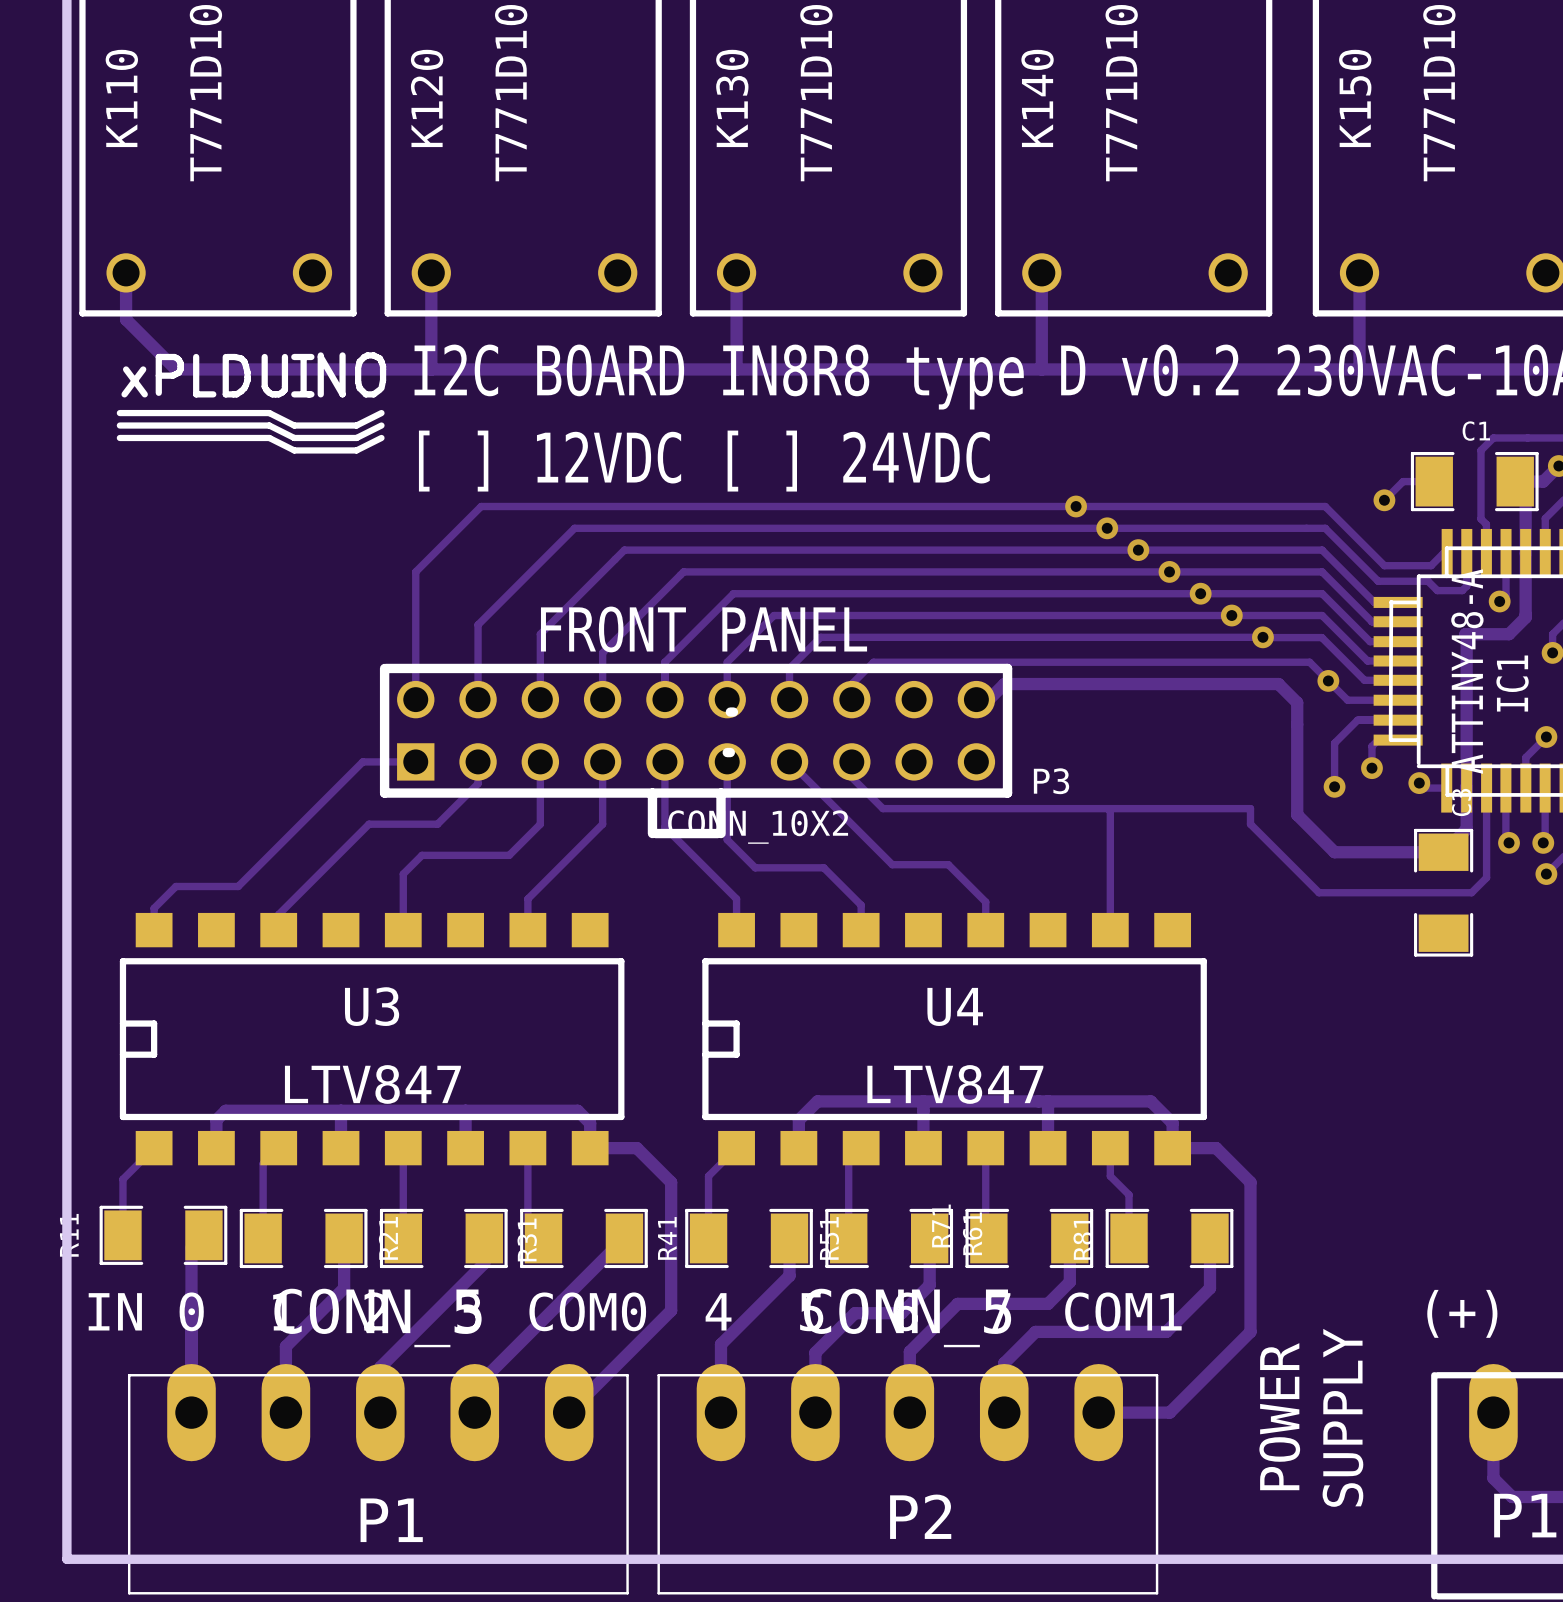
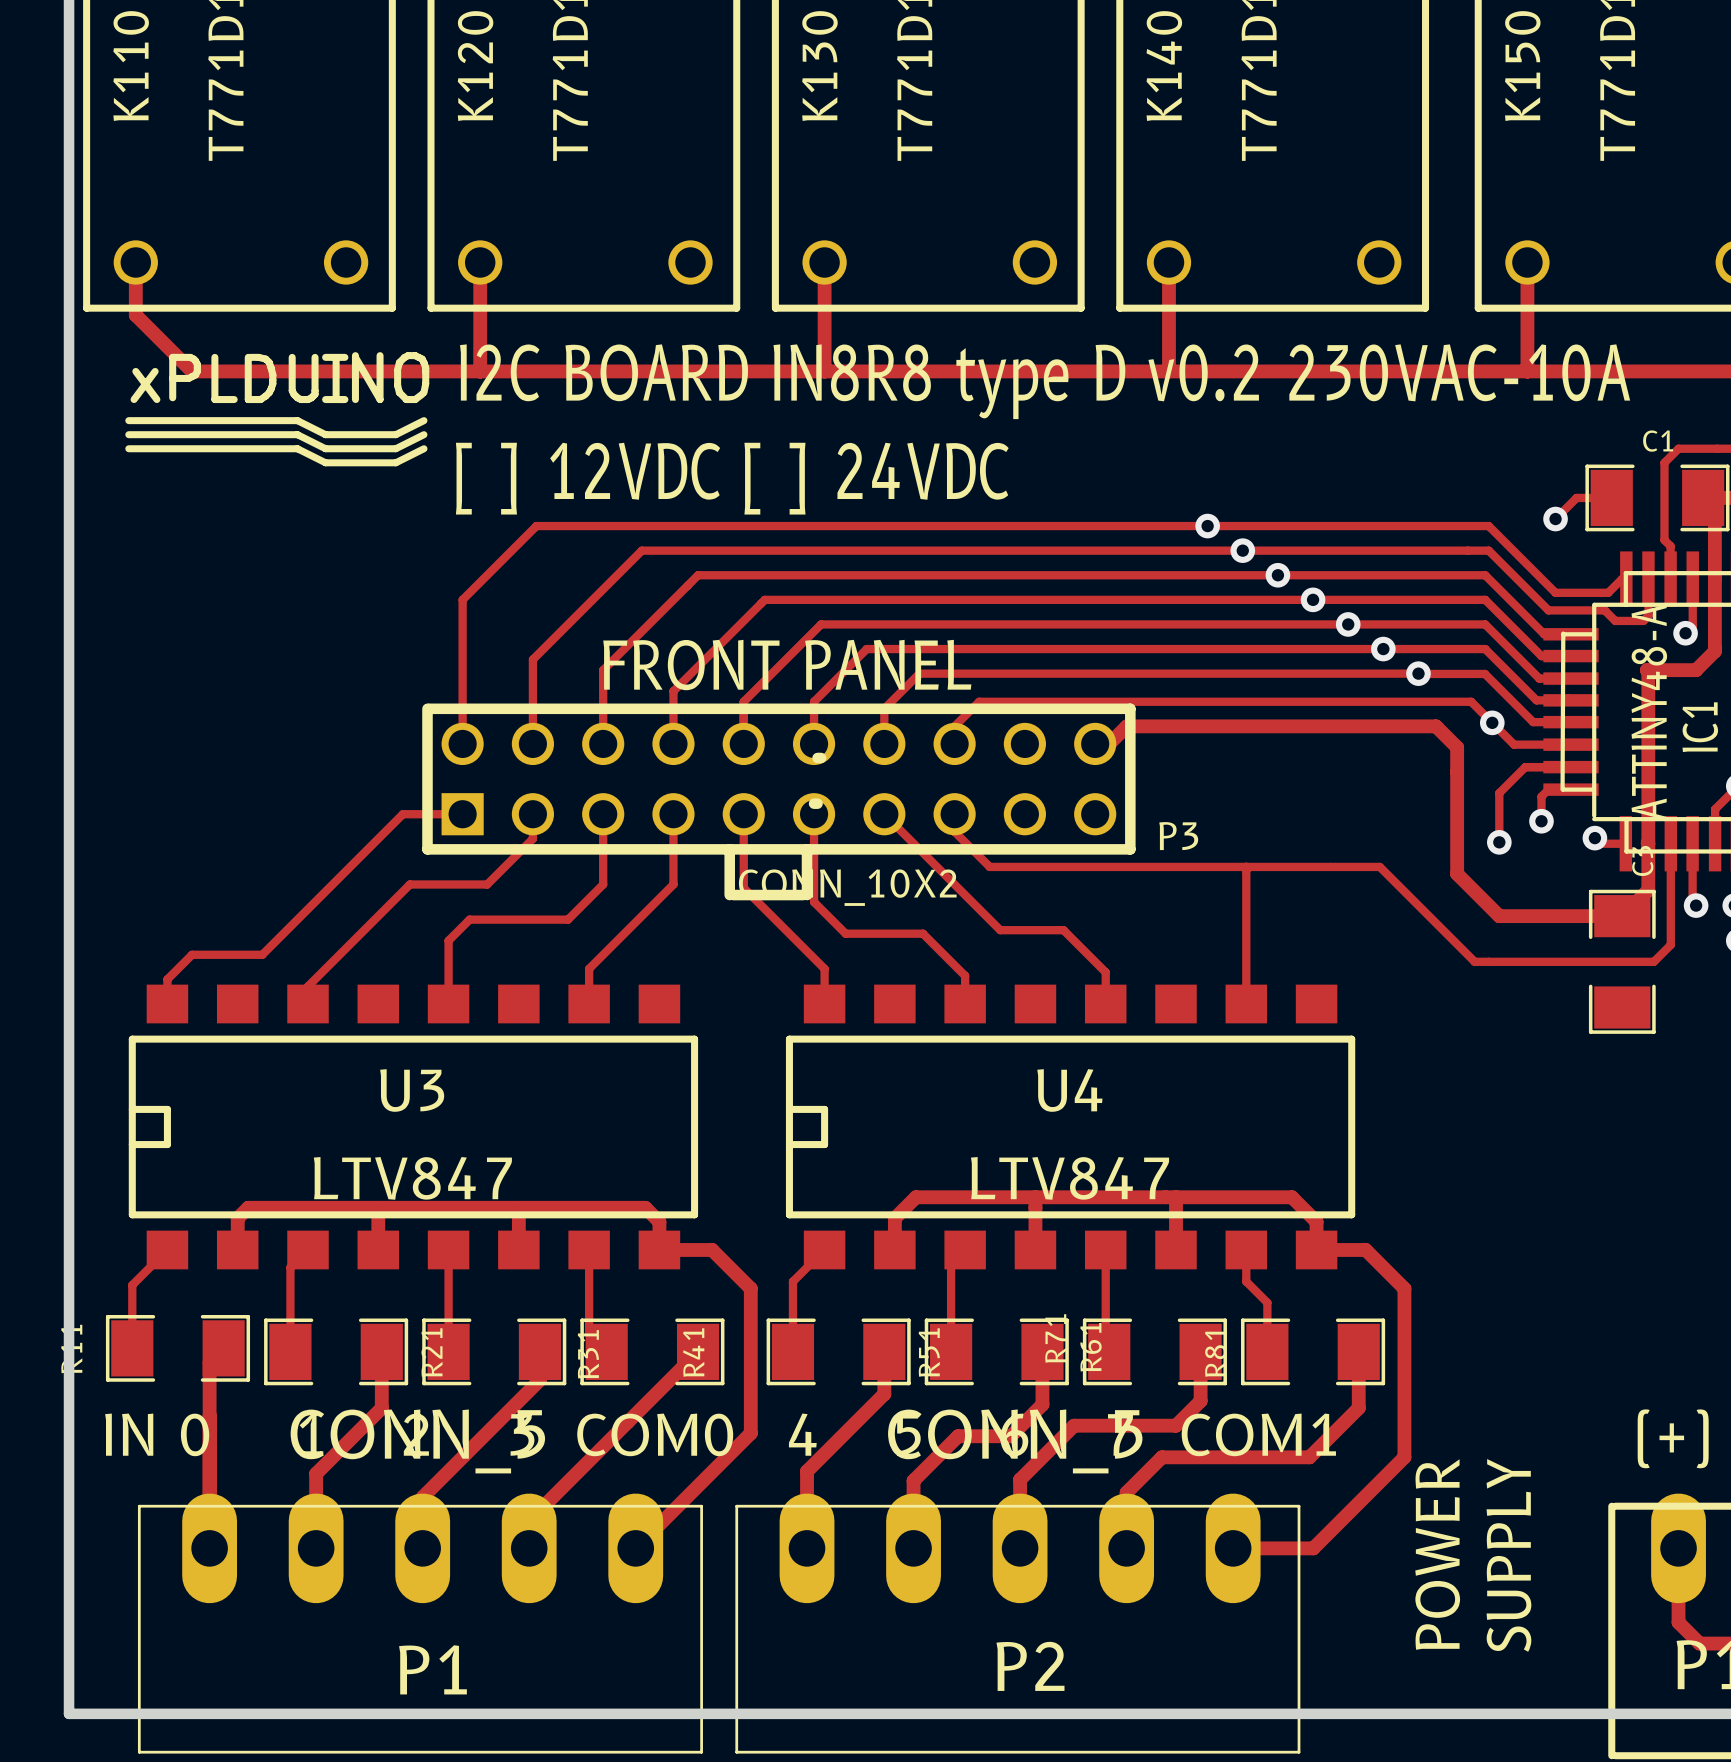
track: (1228, 808) (1250, 808) (1250, 824) (1319, 892) -> (1379, 866) (1474, 961) (1481, 961)
R41 name position: R41 (667, 1238) -> R41 (693, 1352)

